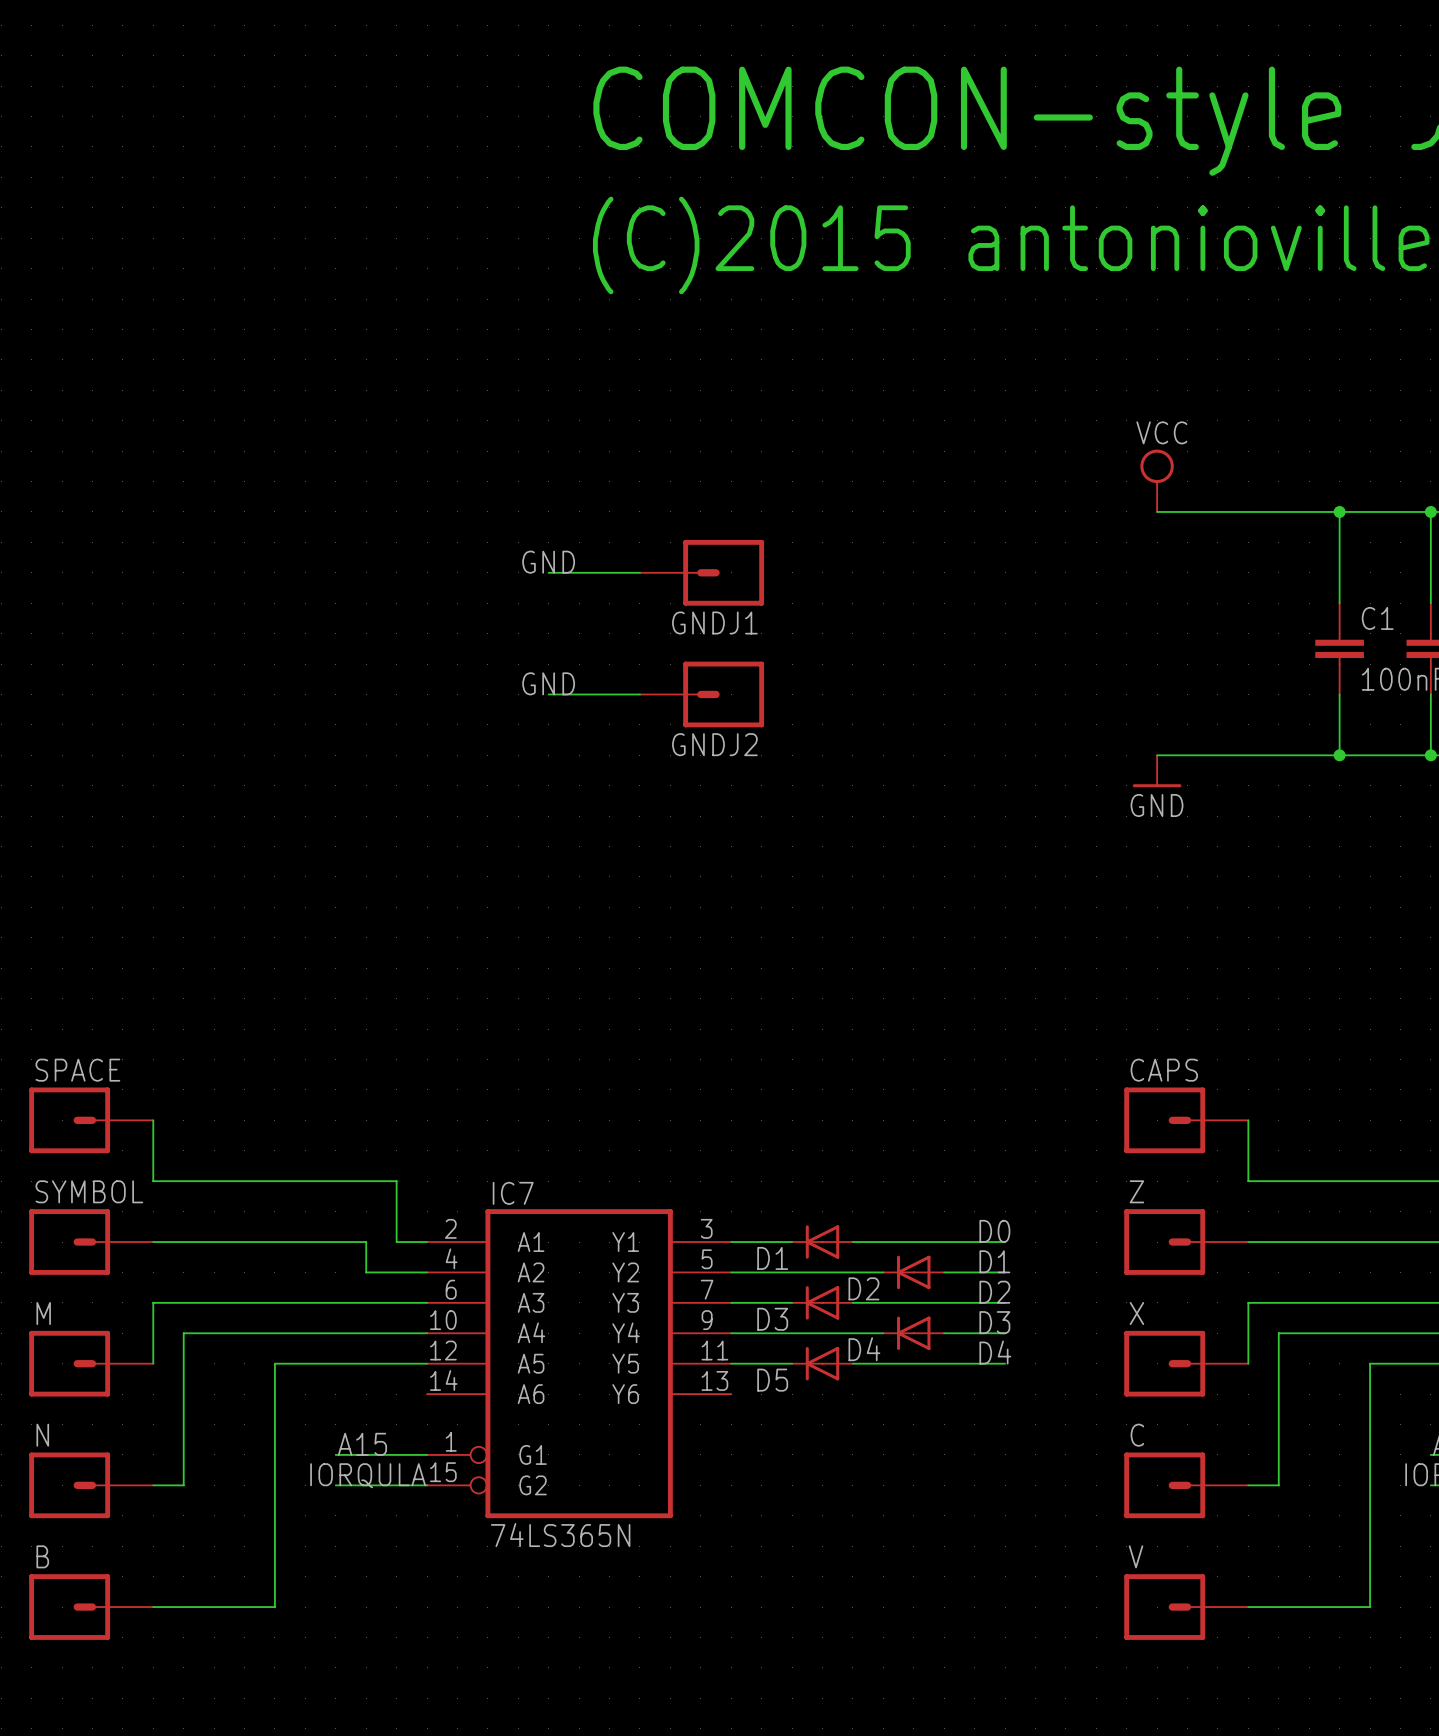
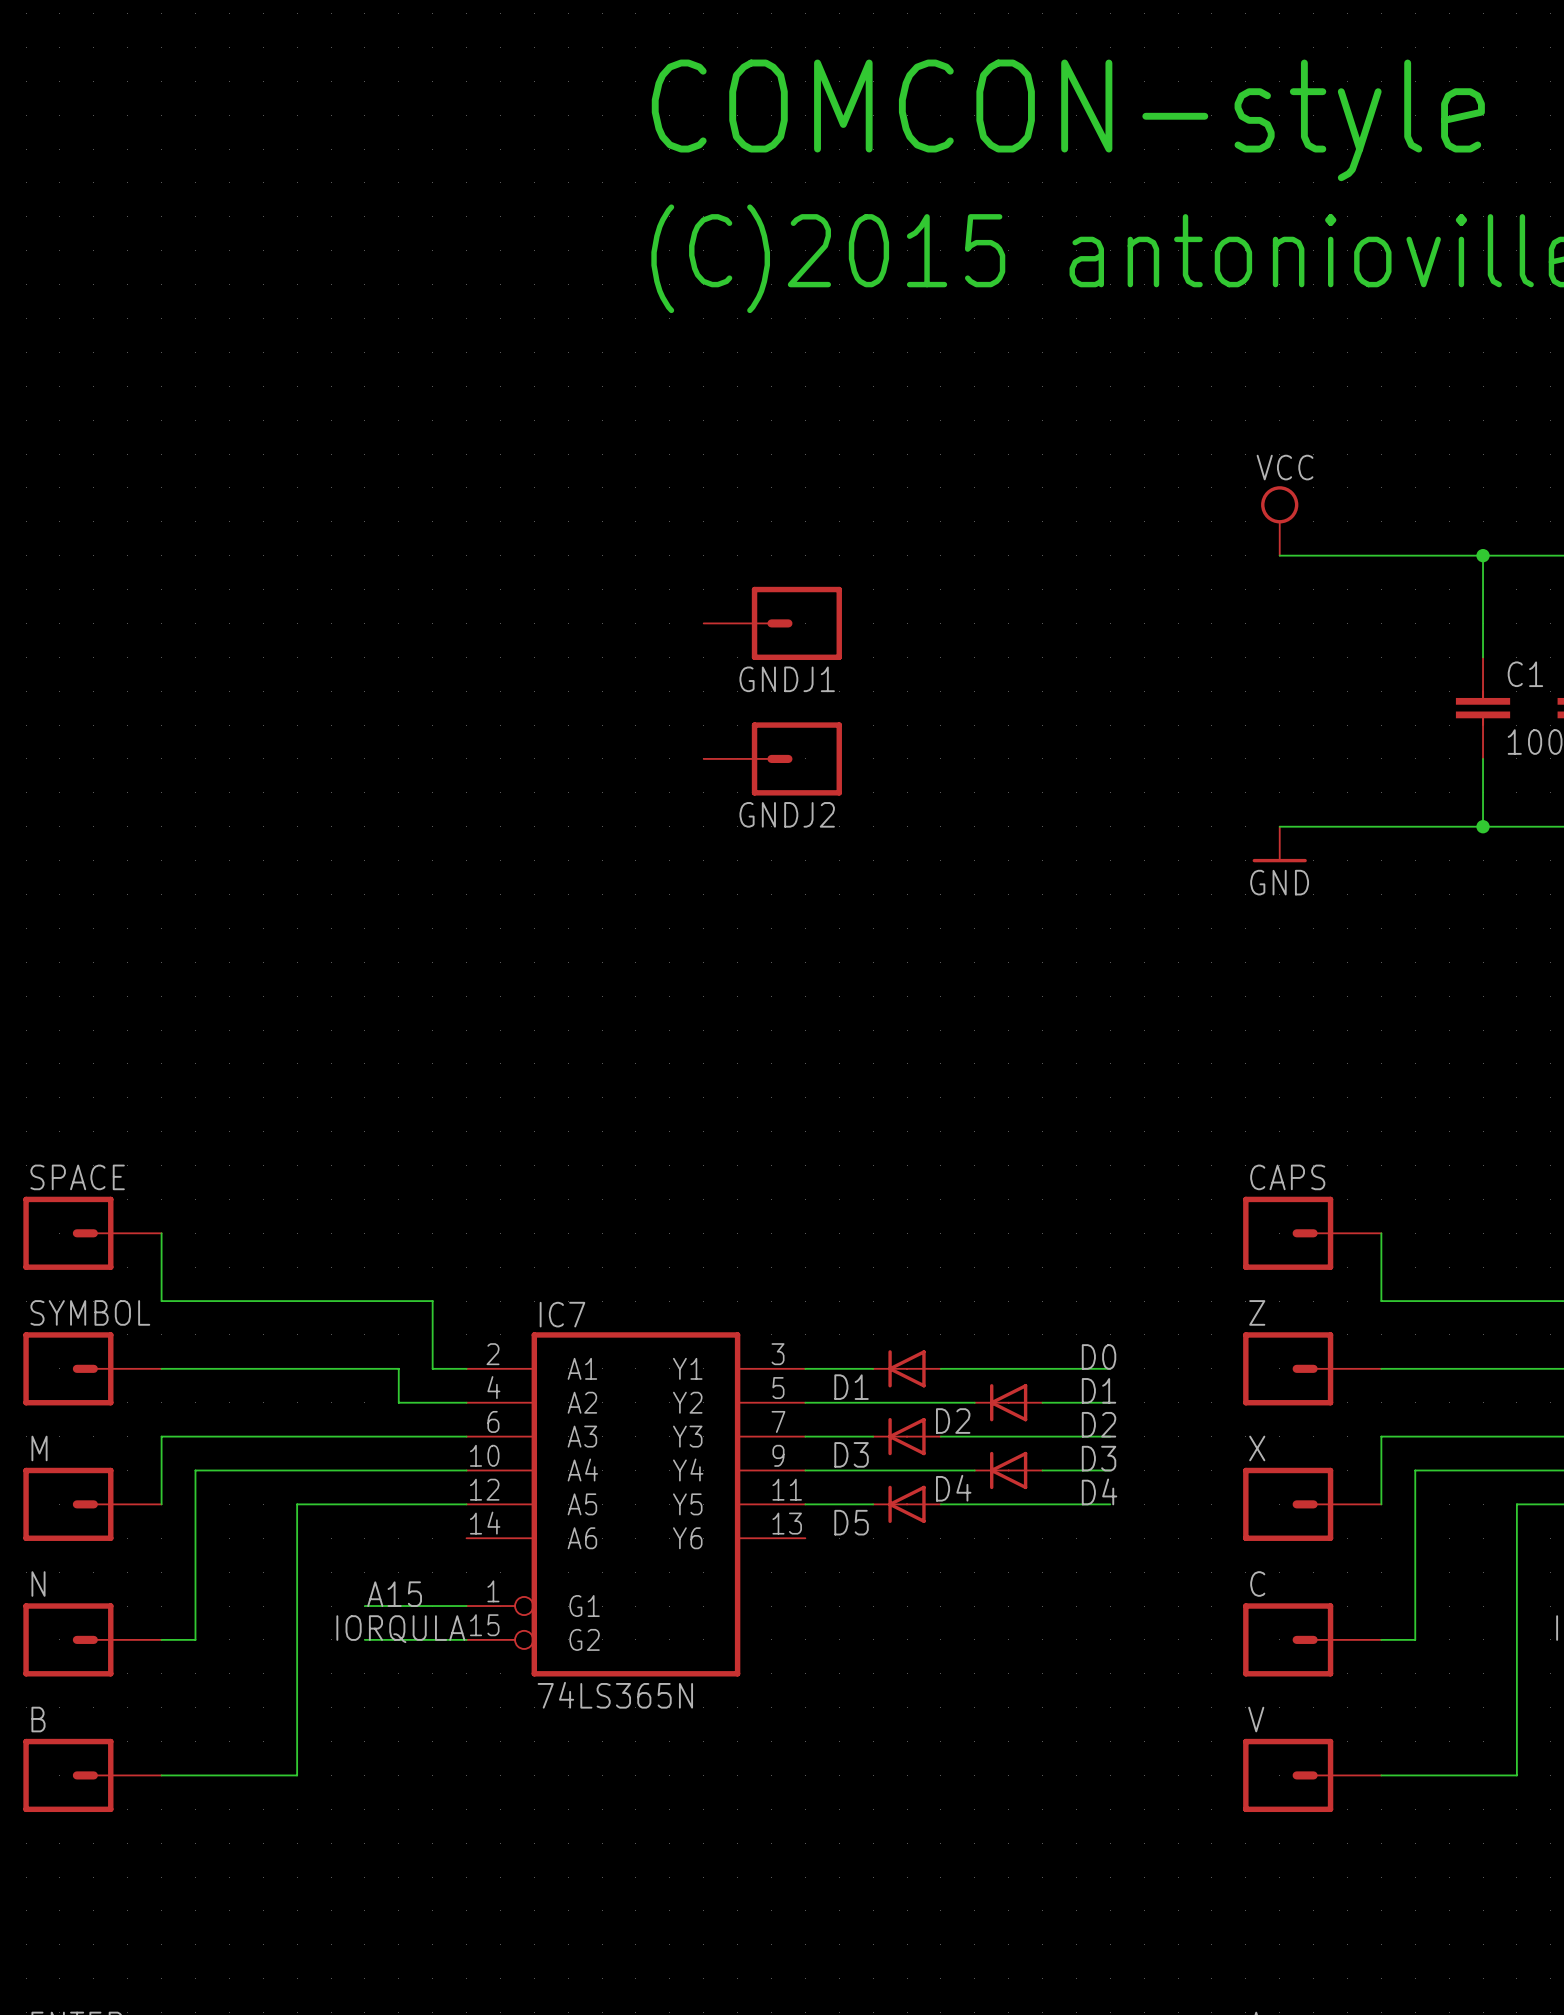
label: GND (548, 562) -> none
wire: (548, 572) (639, 572) -> none
label: GND (548, 683) -> none
wire: (548, 694) (639, 694) -> none

